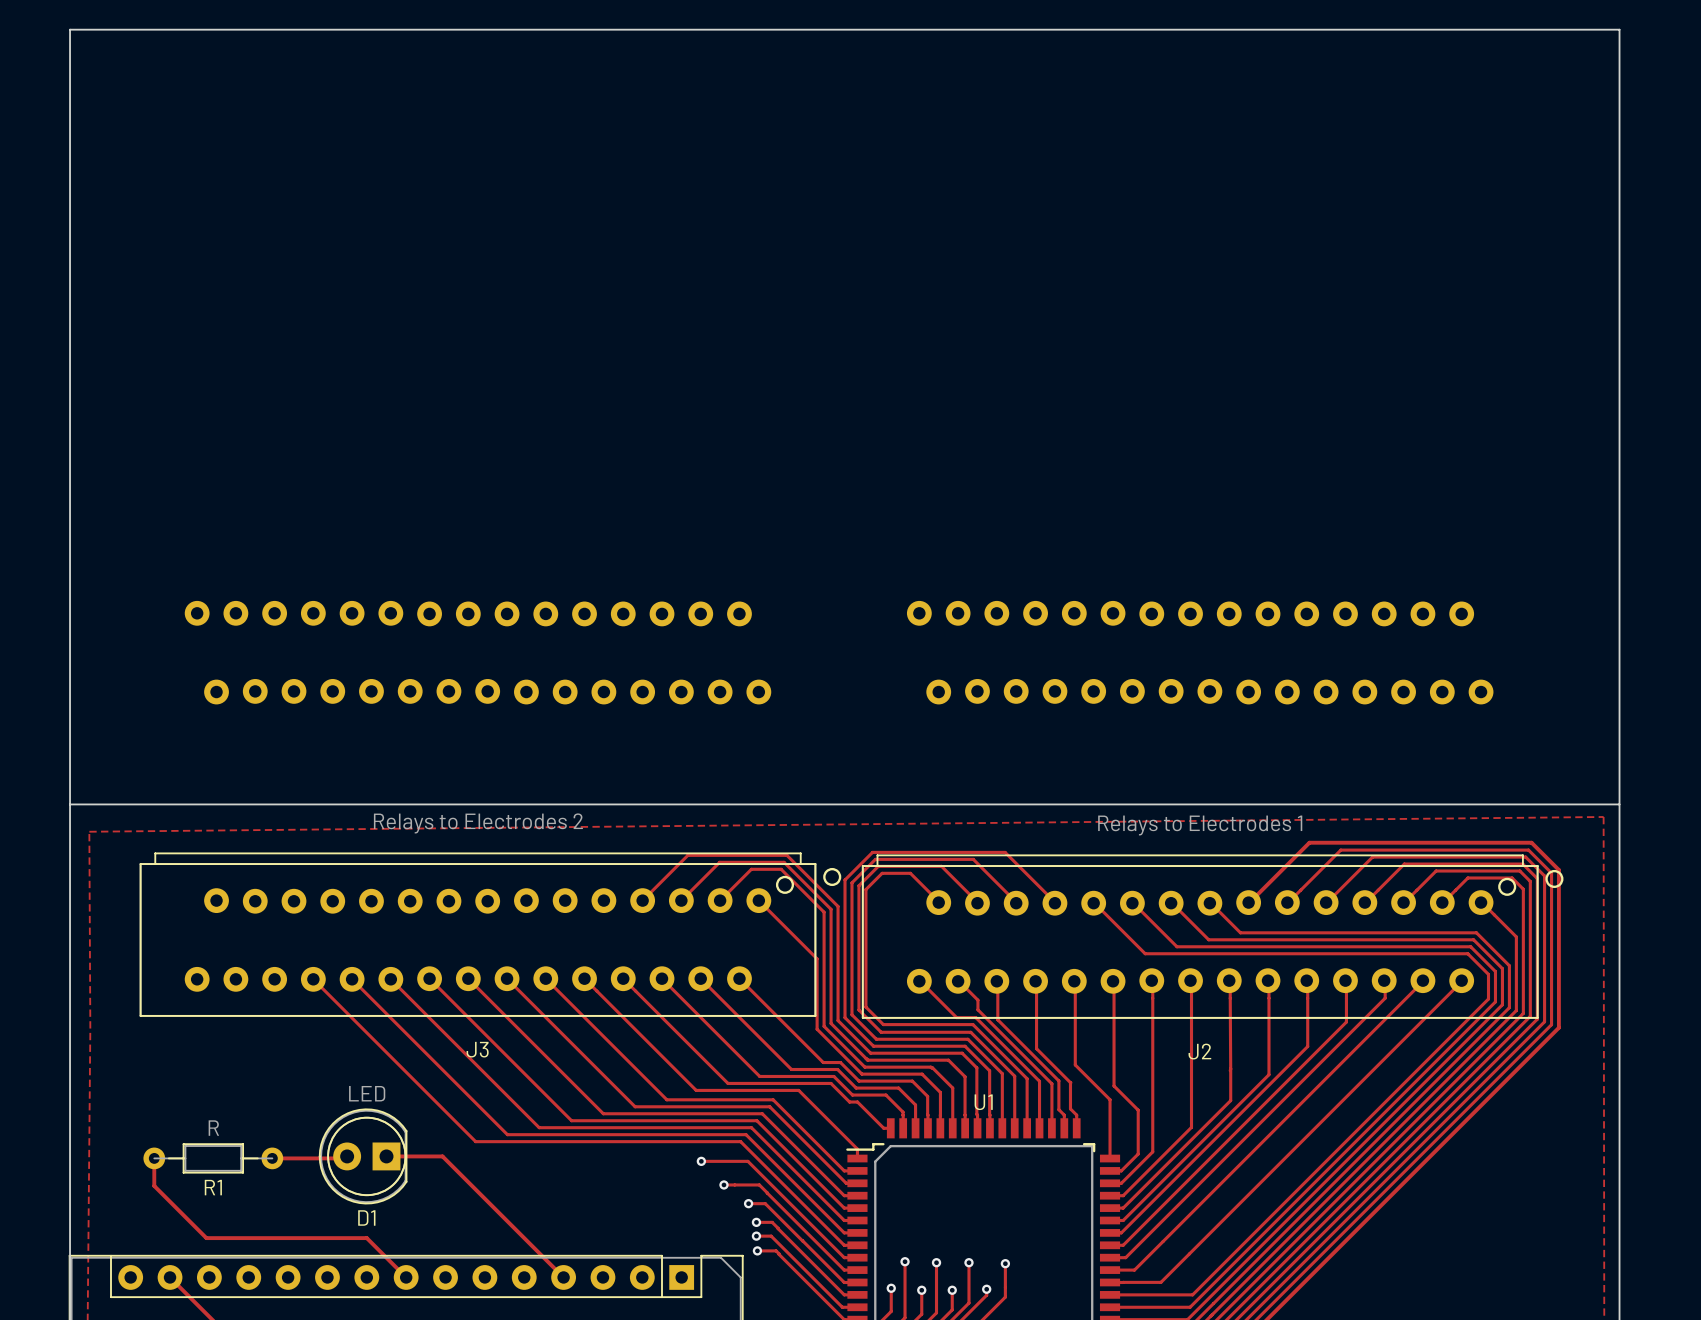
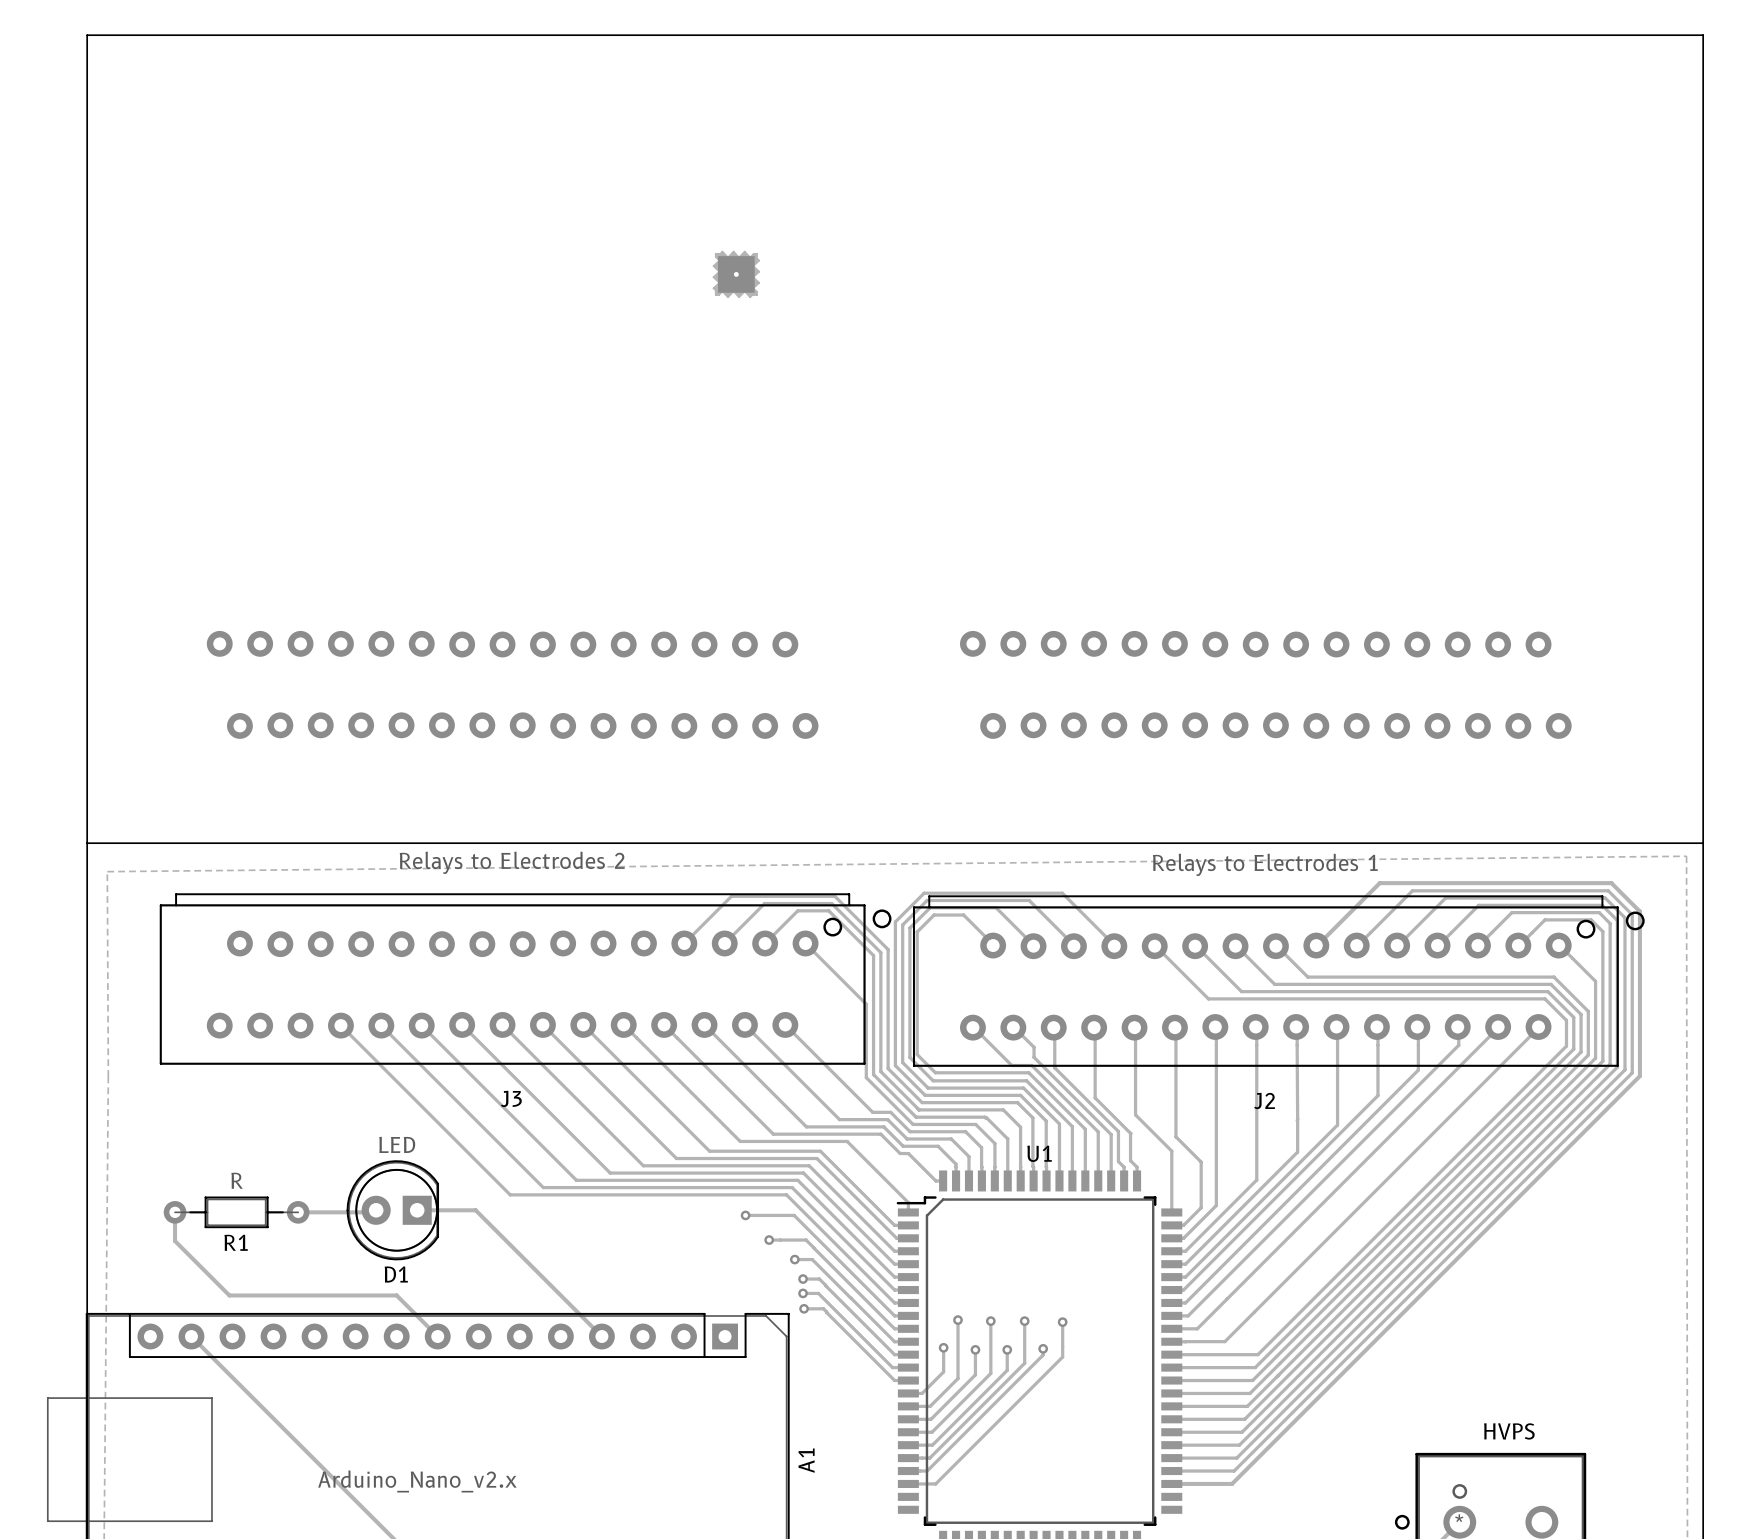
part: none -> (736, 274)

